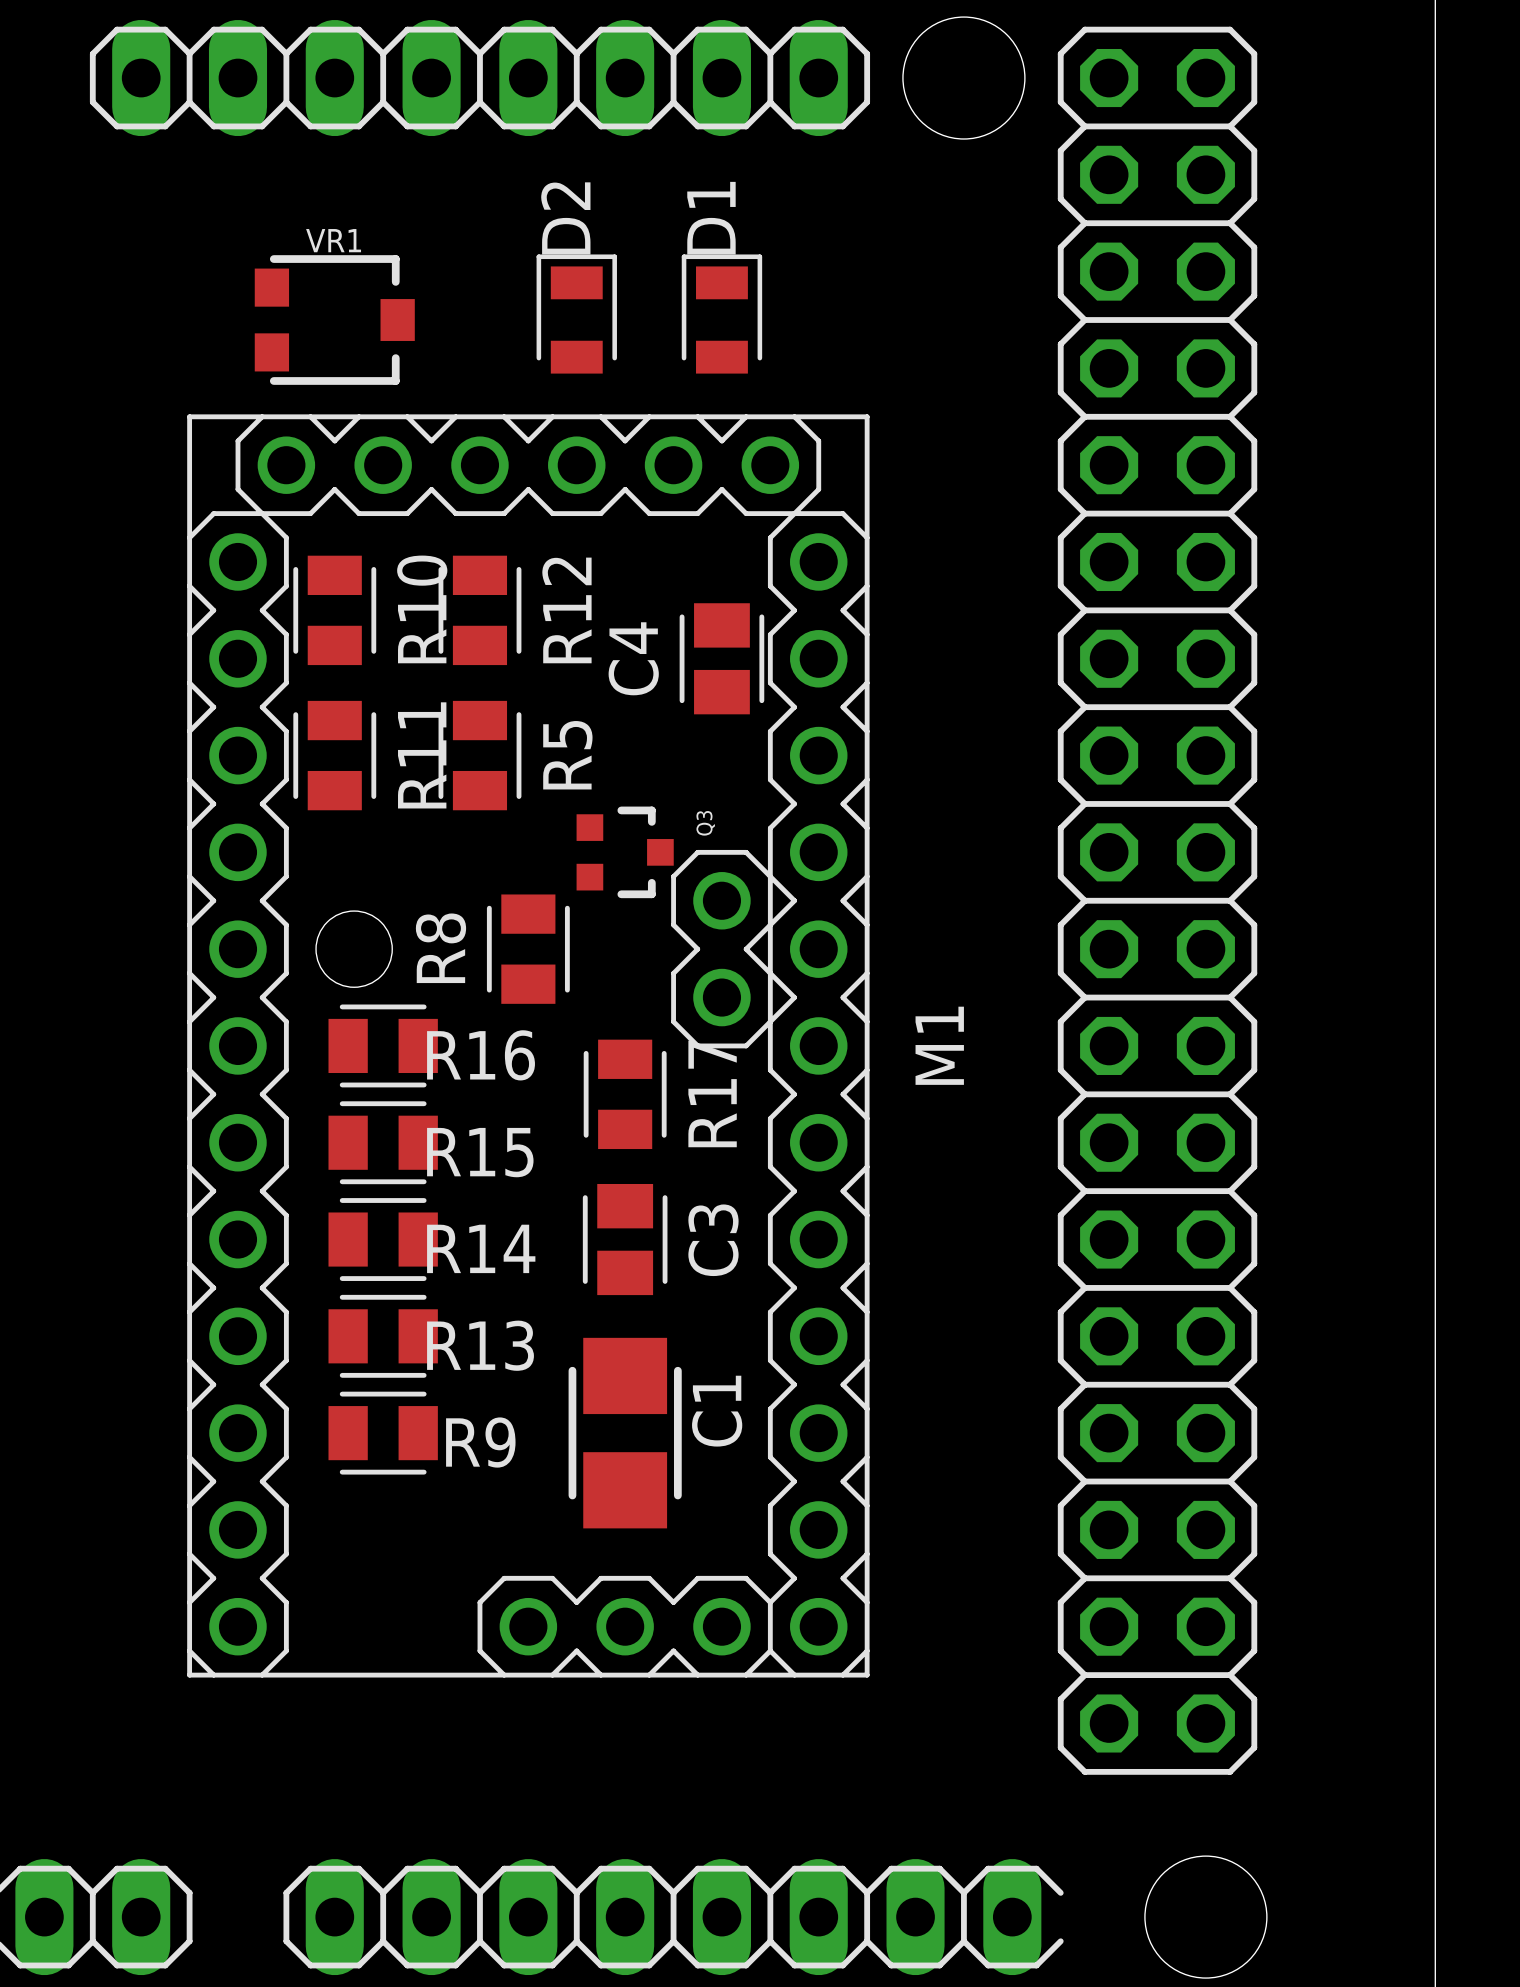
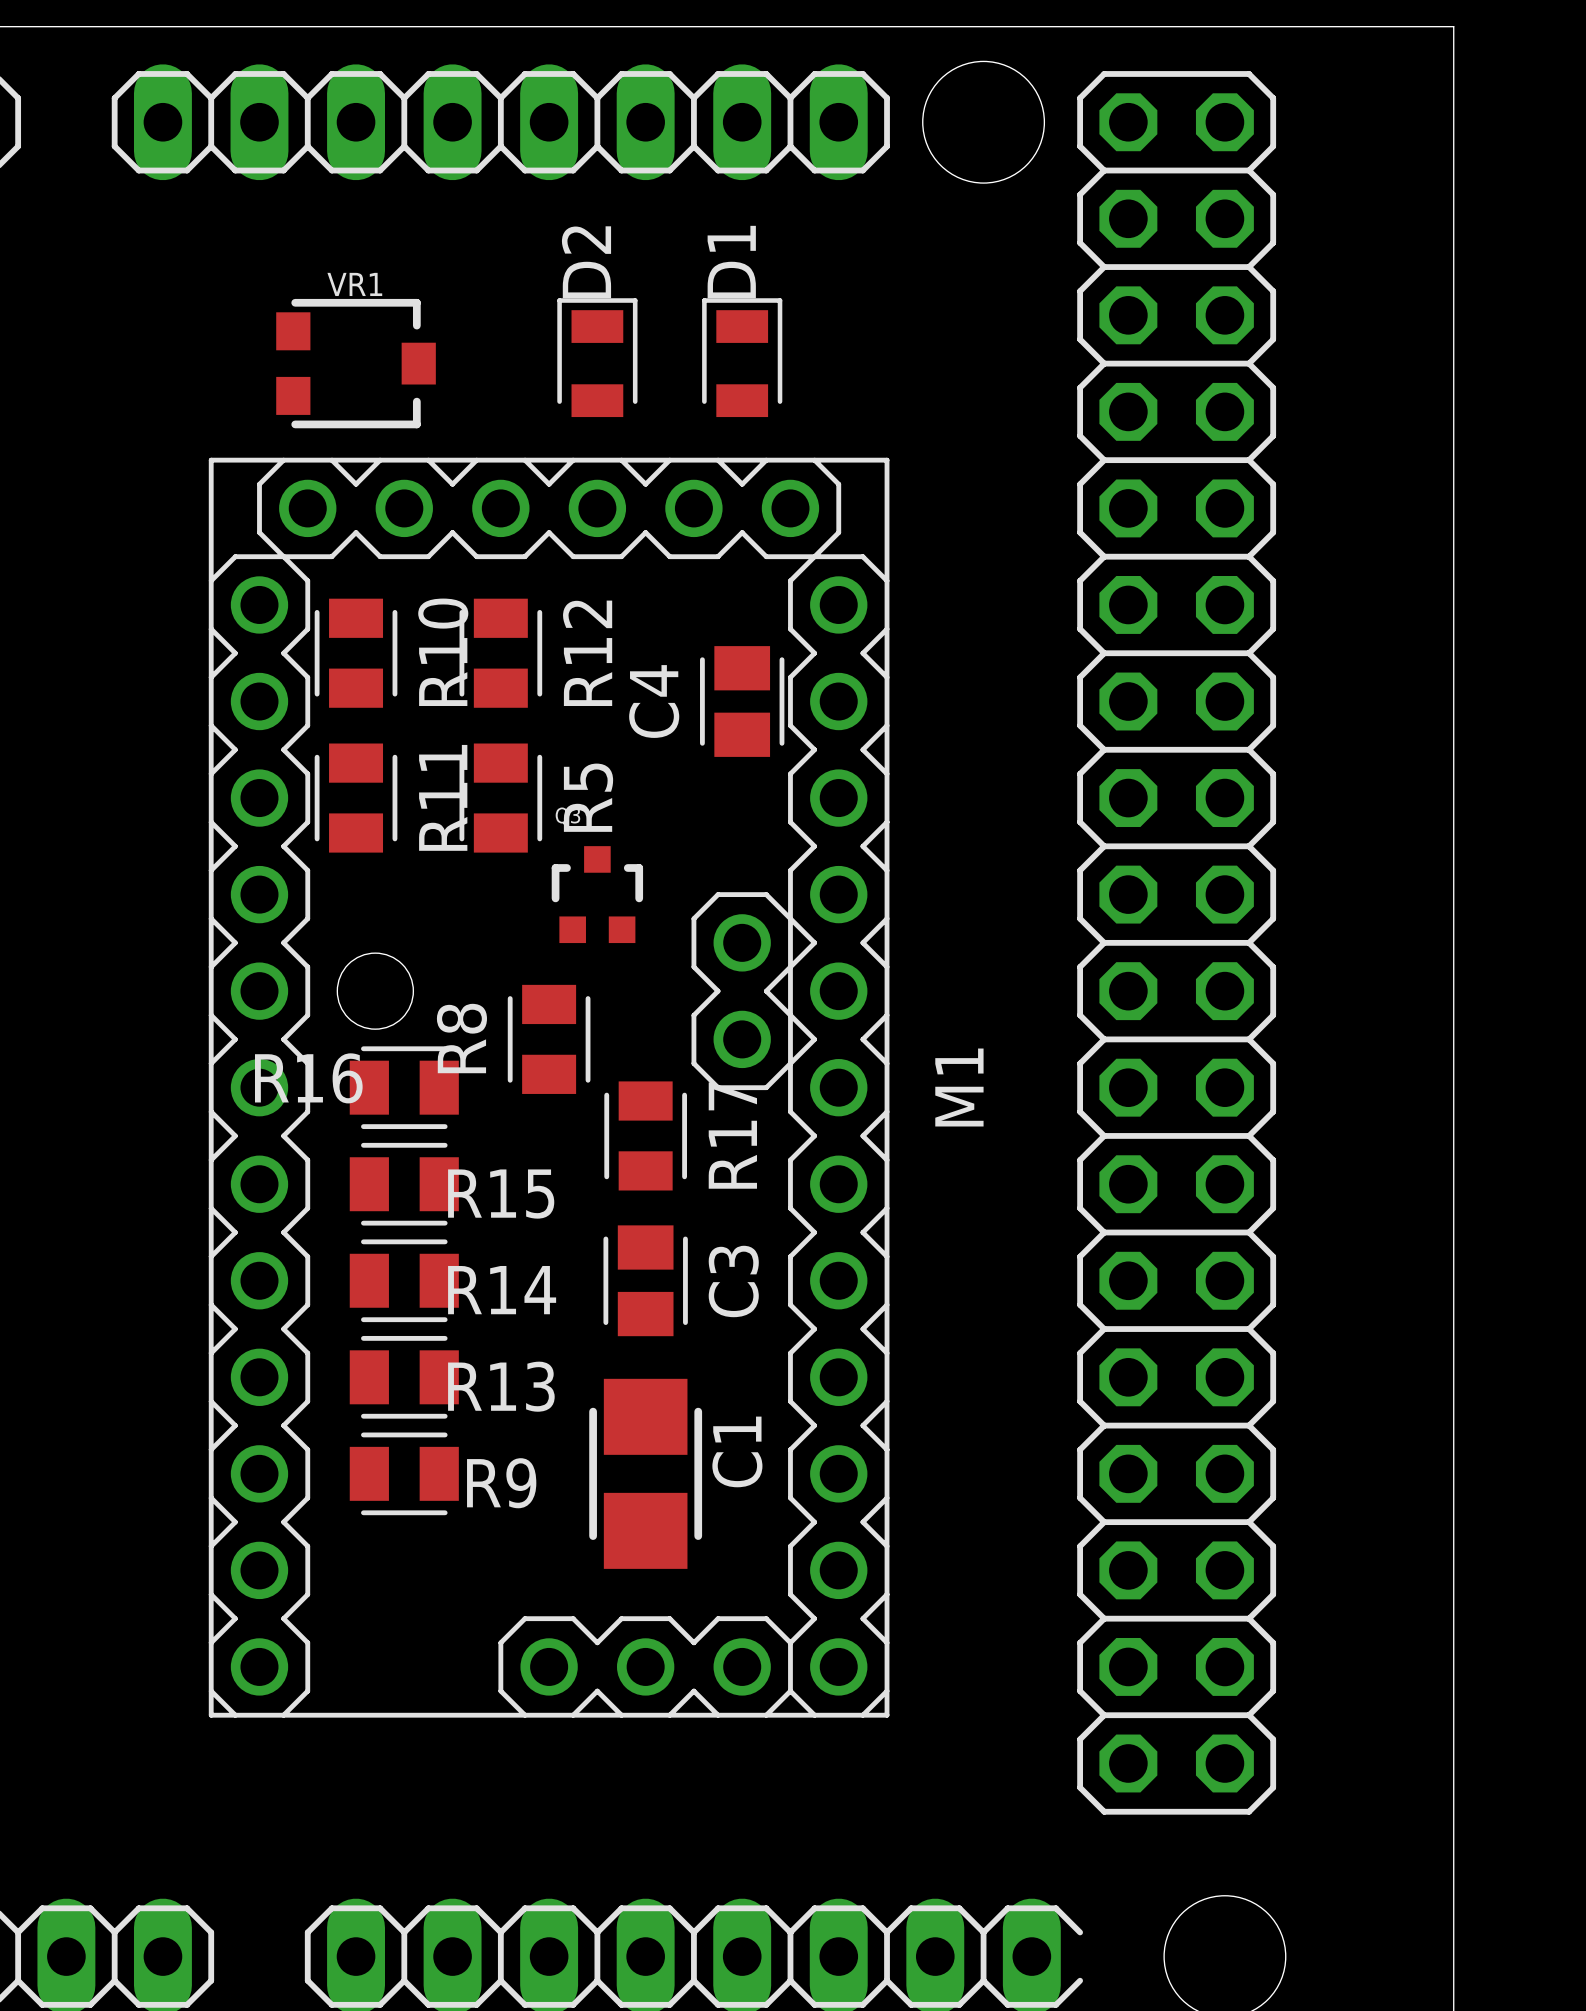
Q3 rotation: 0° (625, 852) -> 90° counterclockwise (597, 894)
R8 position: (528, 949) -> (549, 1039)
R16 name position: R16 (481, 1055) -> R16 (308, 1078)

